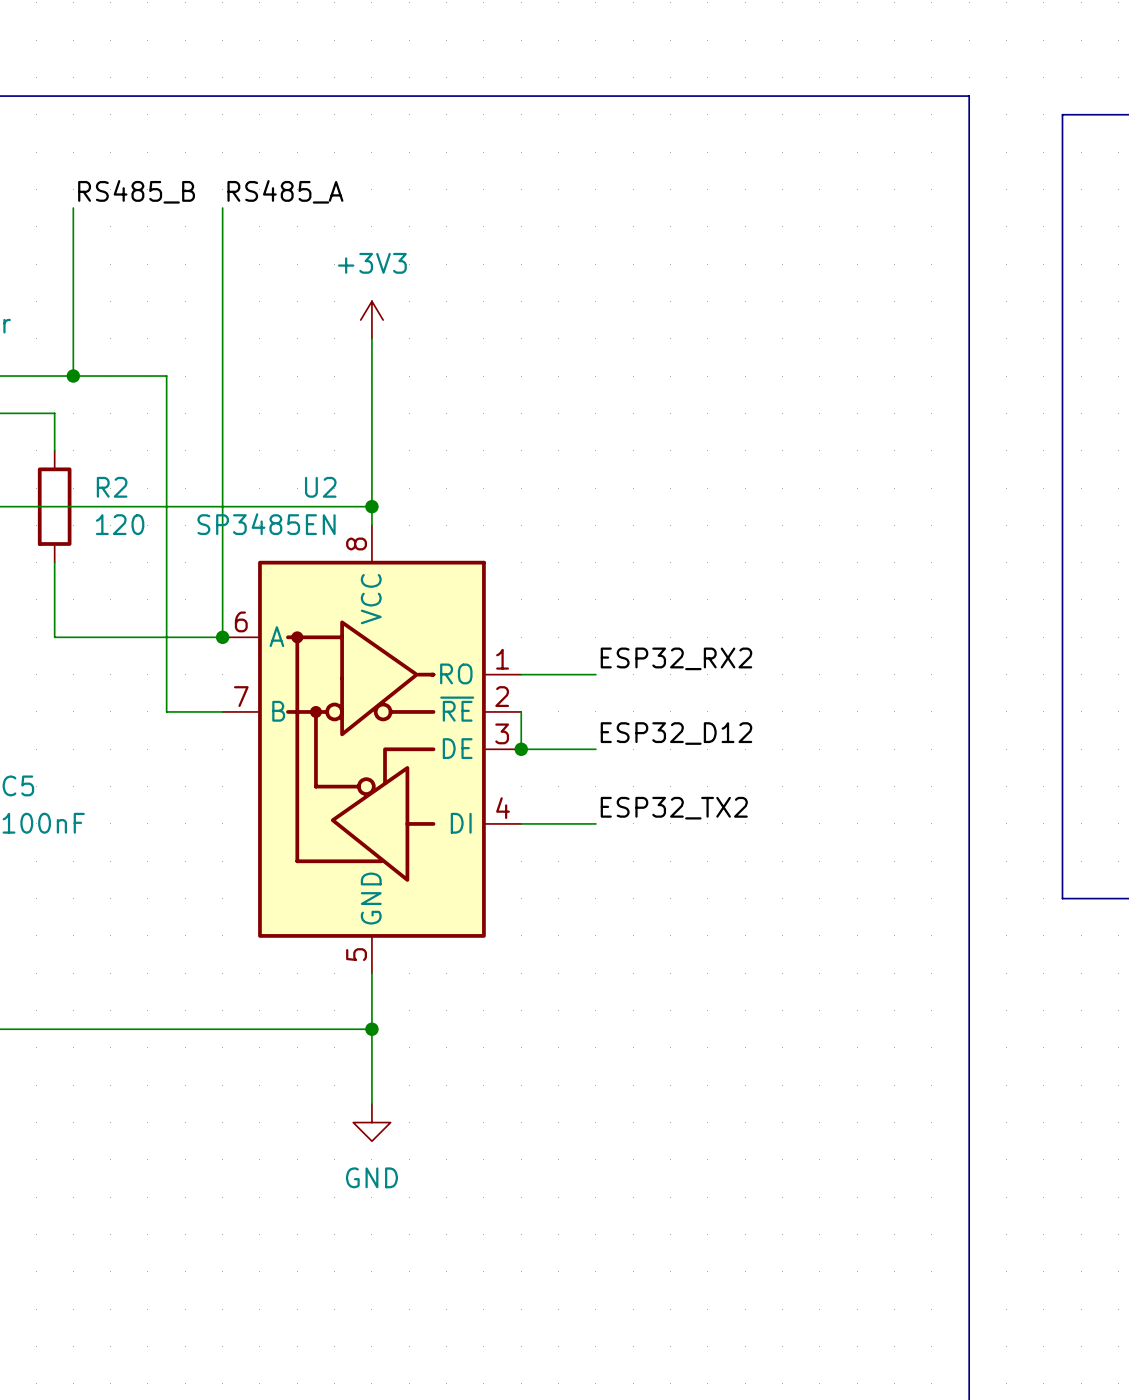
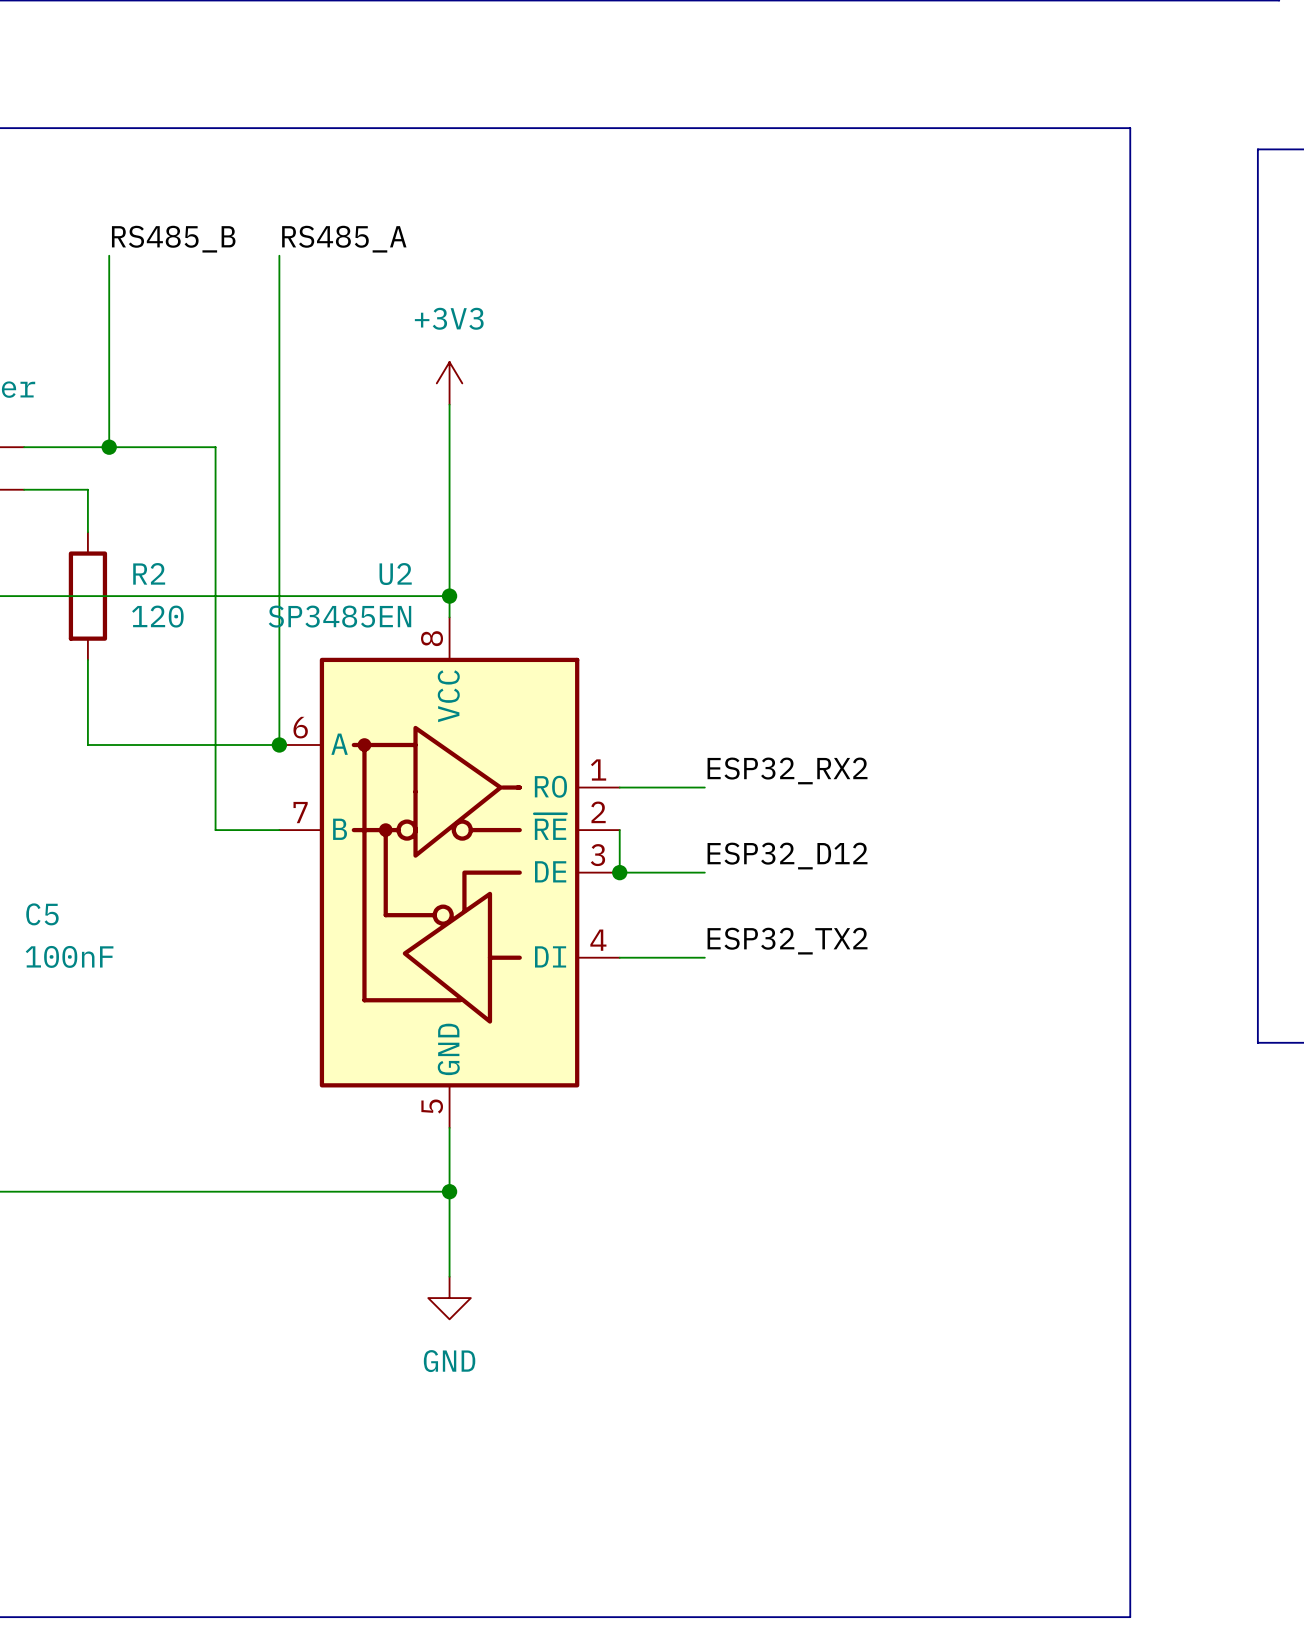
line: (1081, 114) (1062, 114) (1062, 898) (1081, 898) -> (1257, 149) (1257, 1042)

